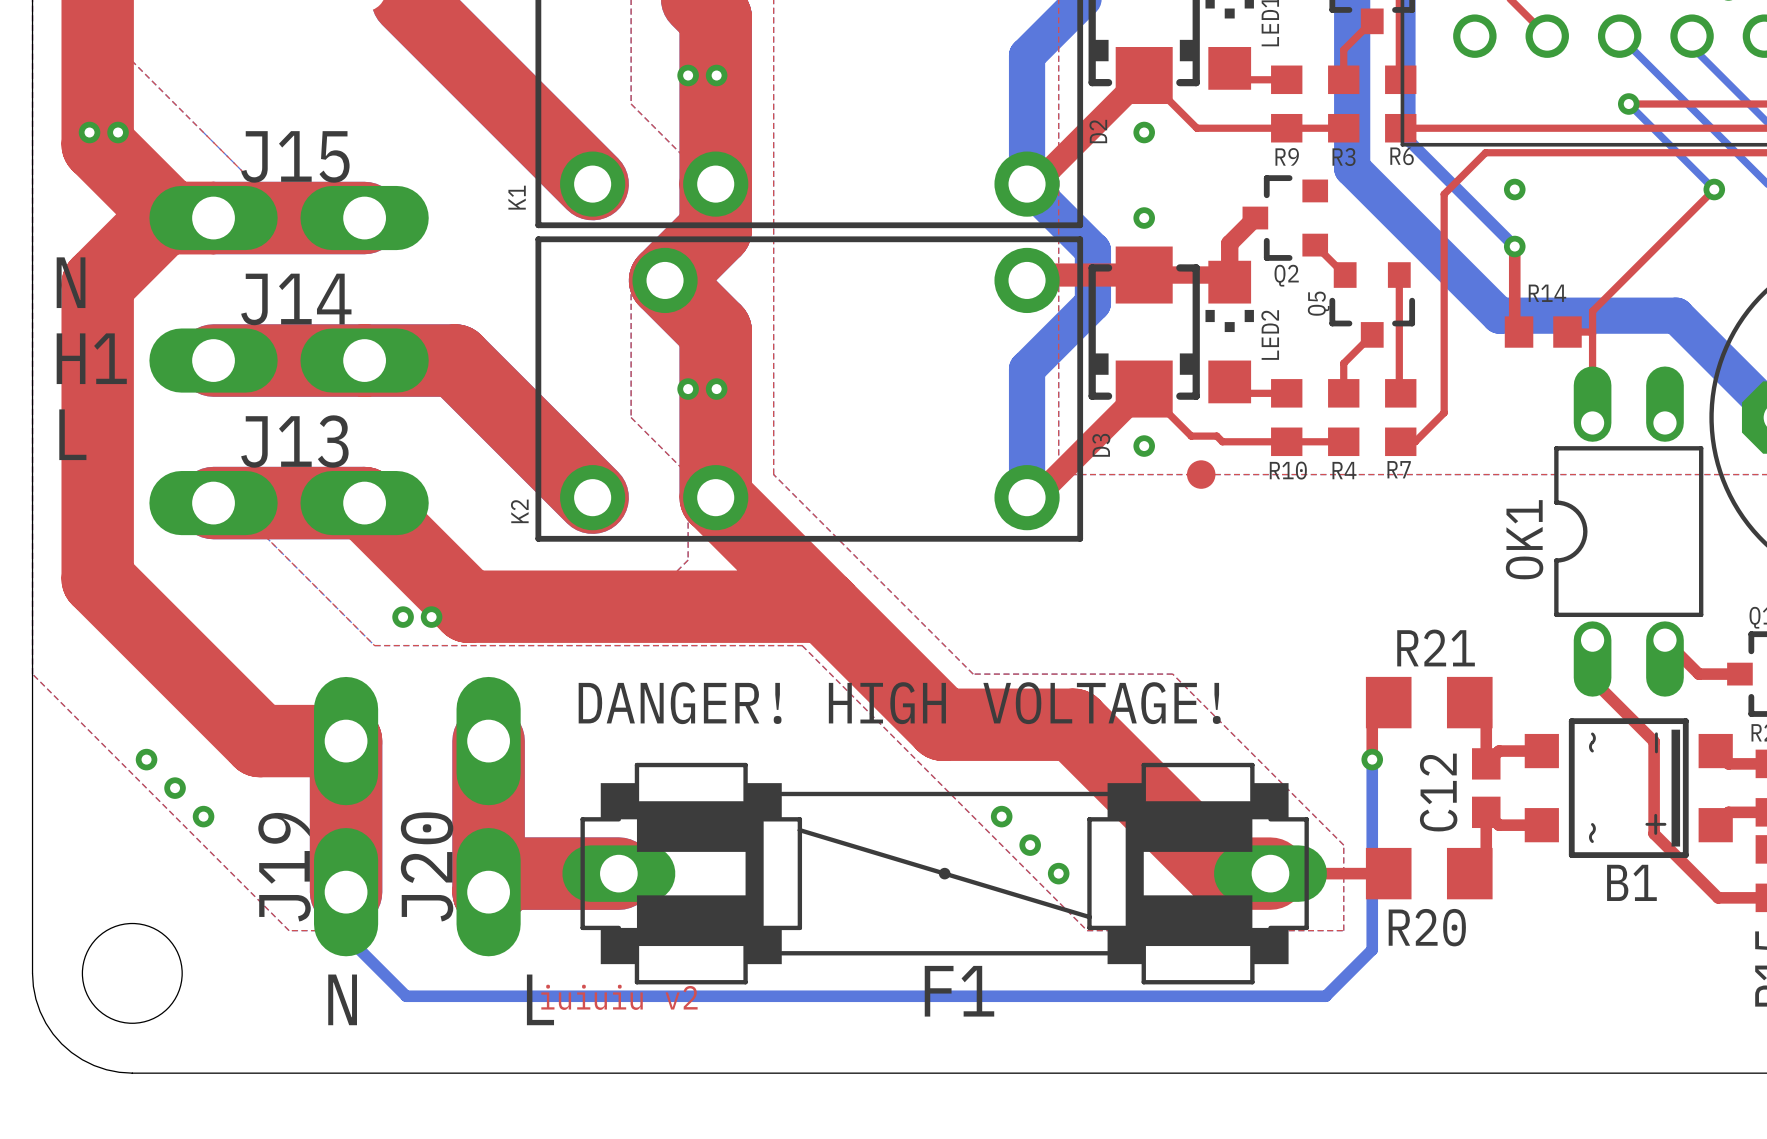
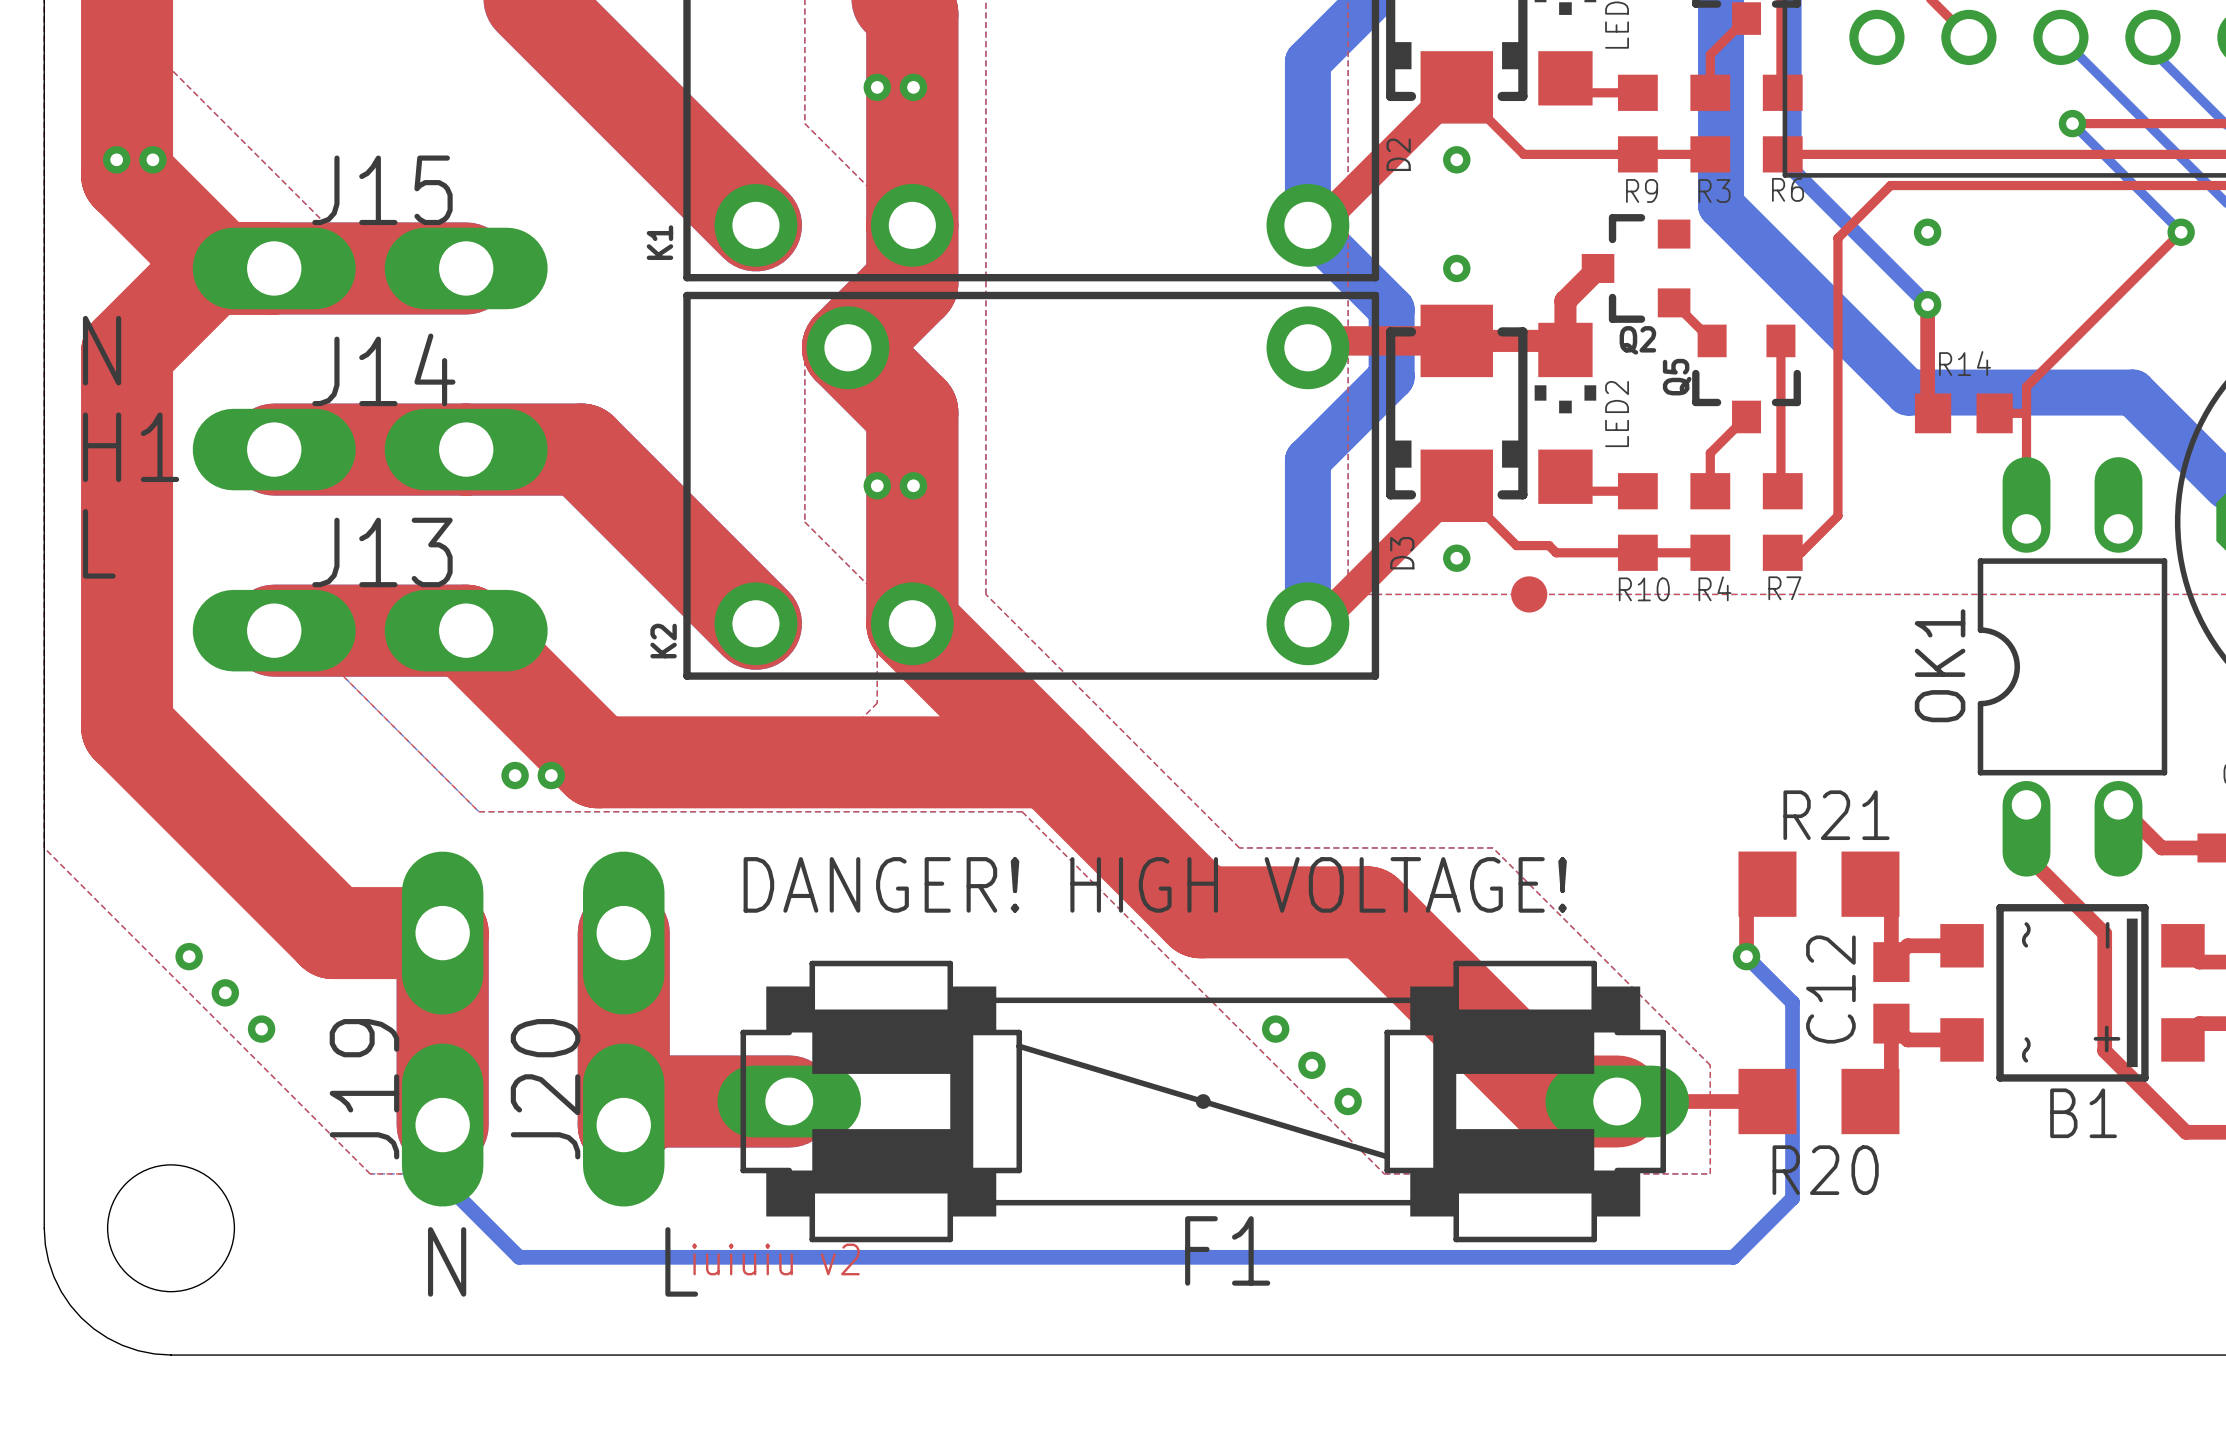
bottom track: (1372, 759) (1372, 949) (1325, 996) -> (1746, 956) (1792, 1002) (1792, 1198) (1733, 1257) (1687, 1257)

